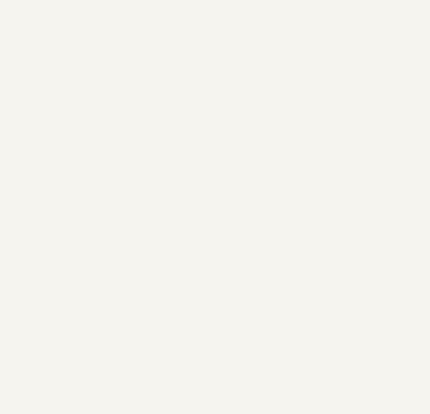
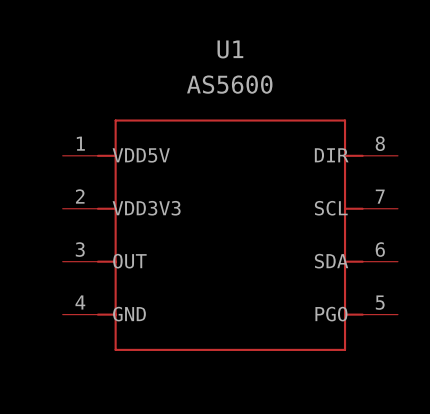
U1: none -> AS5600 (230, 235)

